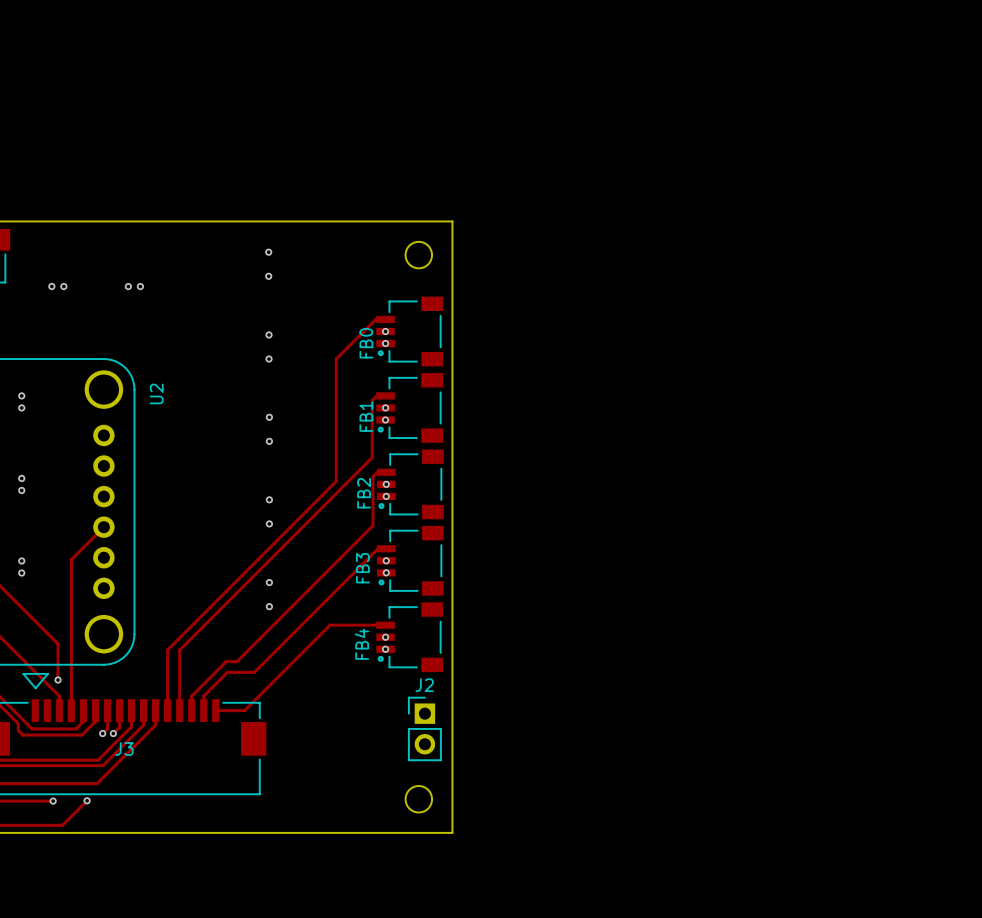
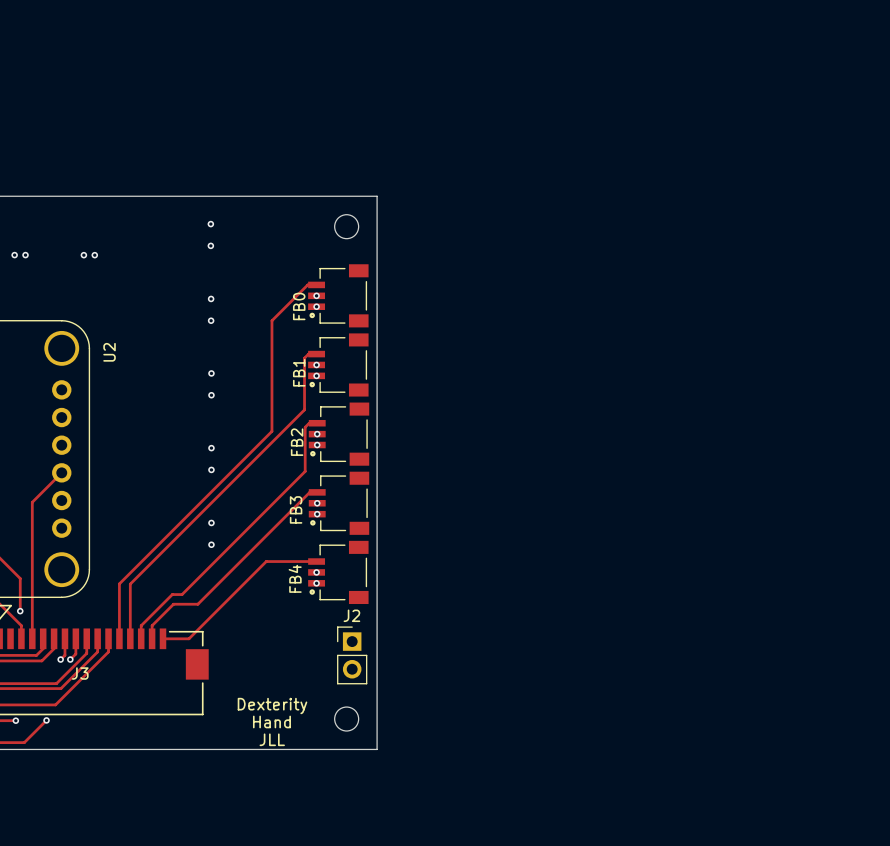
text: none -> Dexterity (272, 706)
text: none -> Hand (271, 721)
text: none -> JLL (272, 739)

